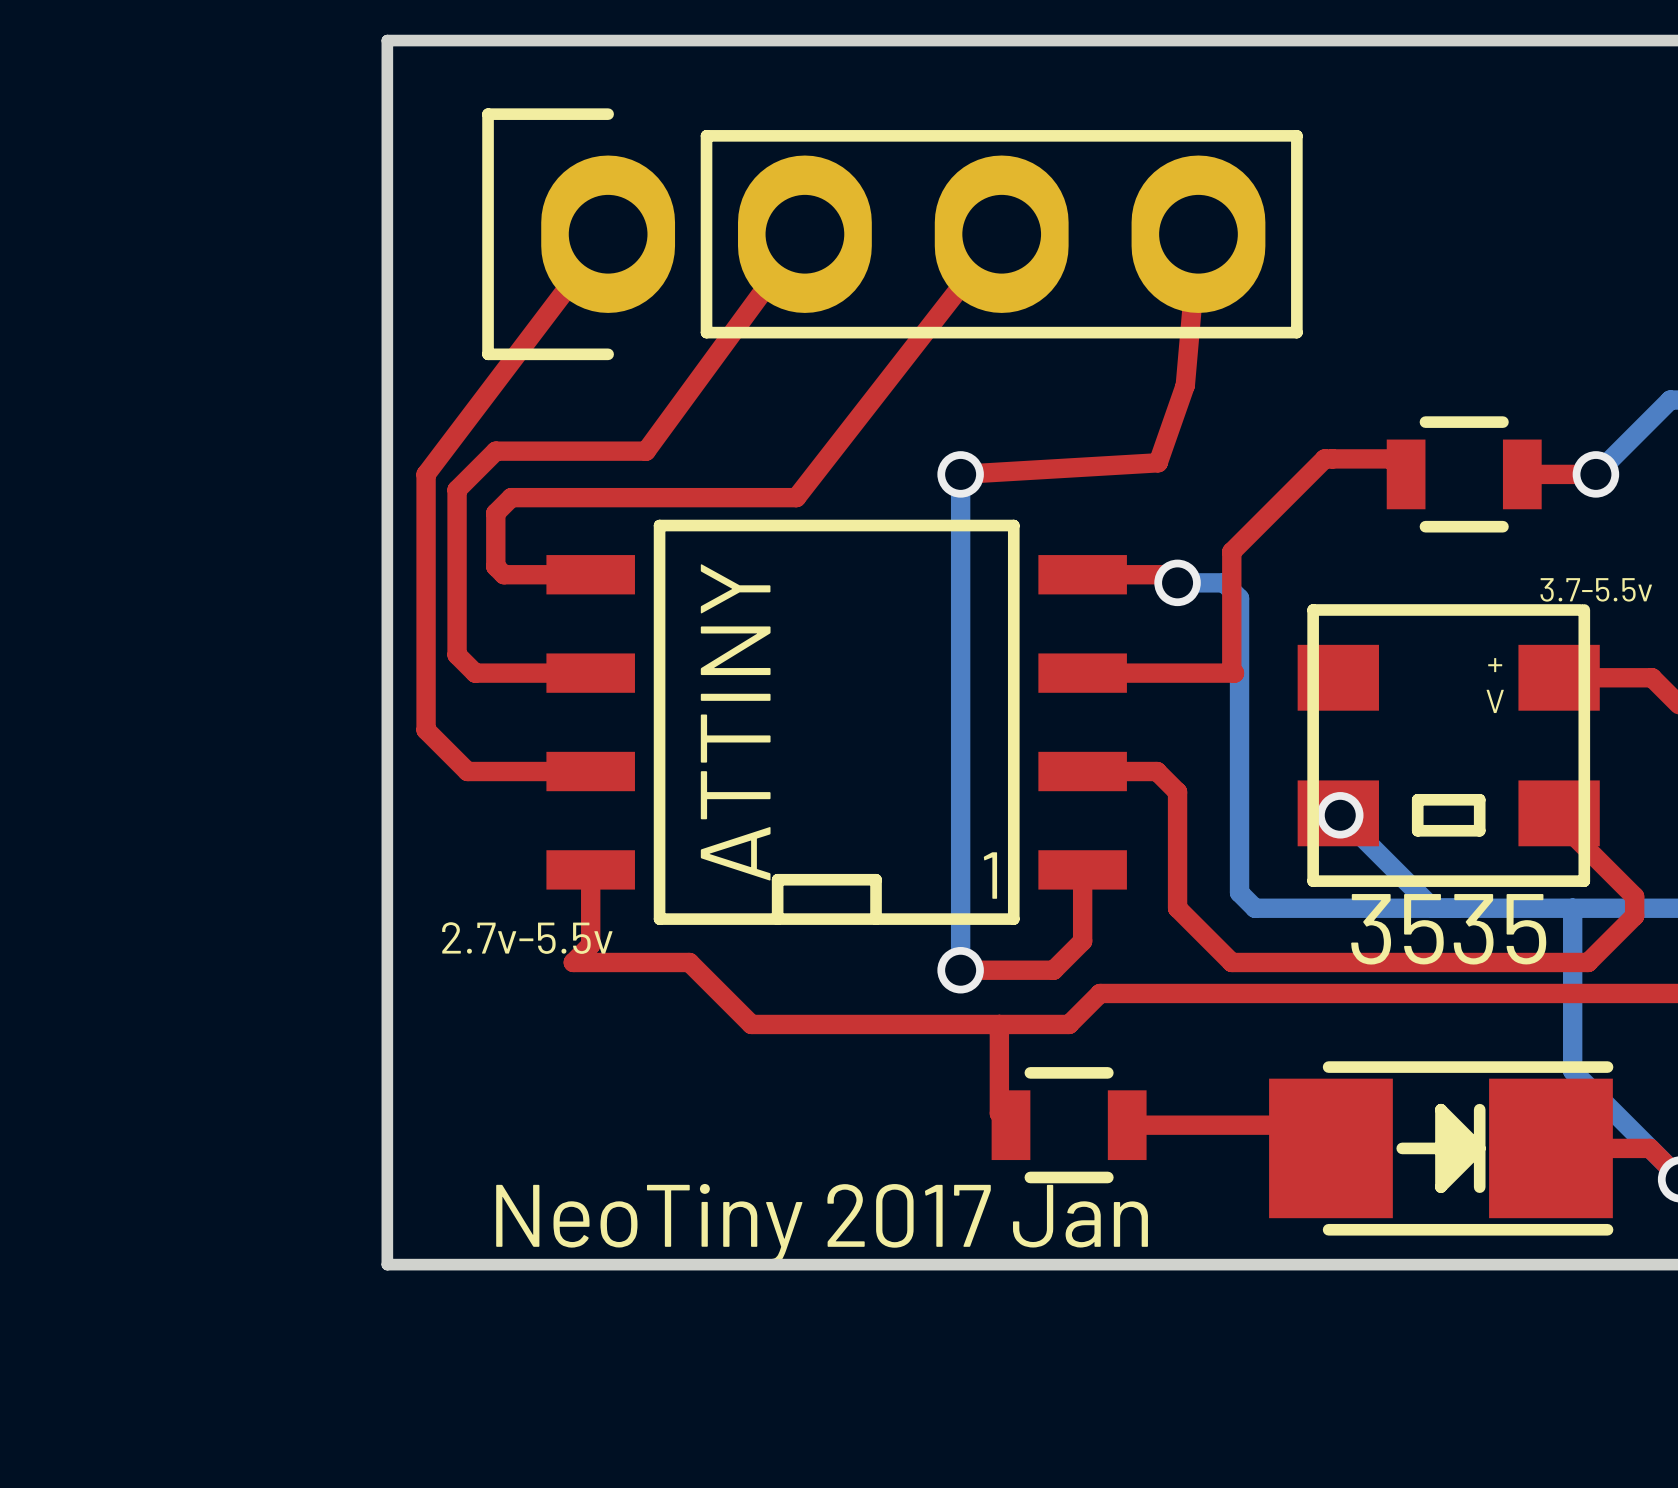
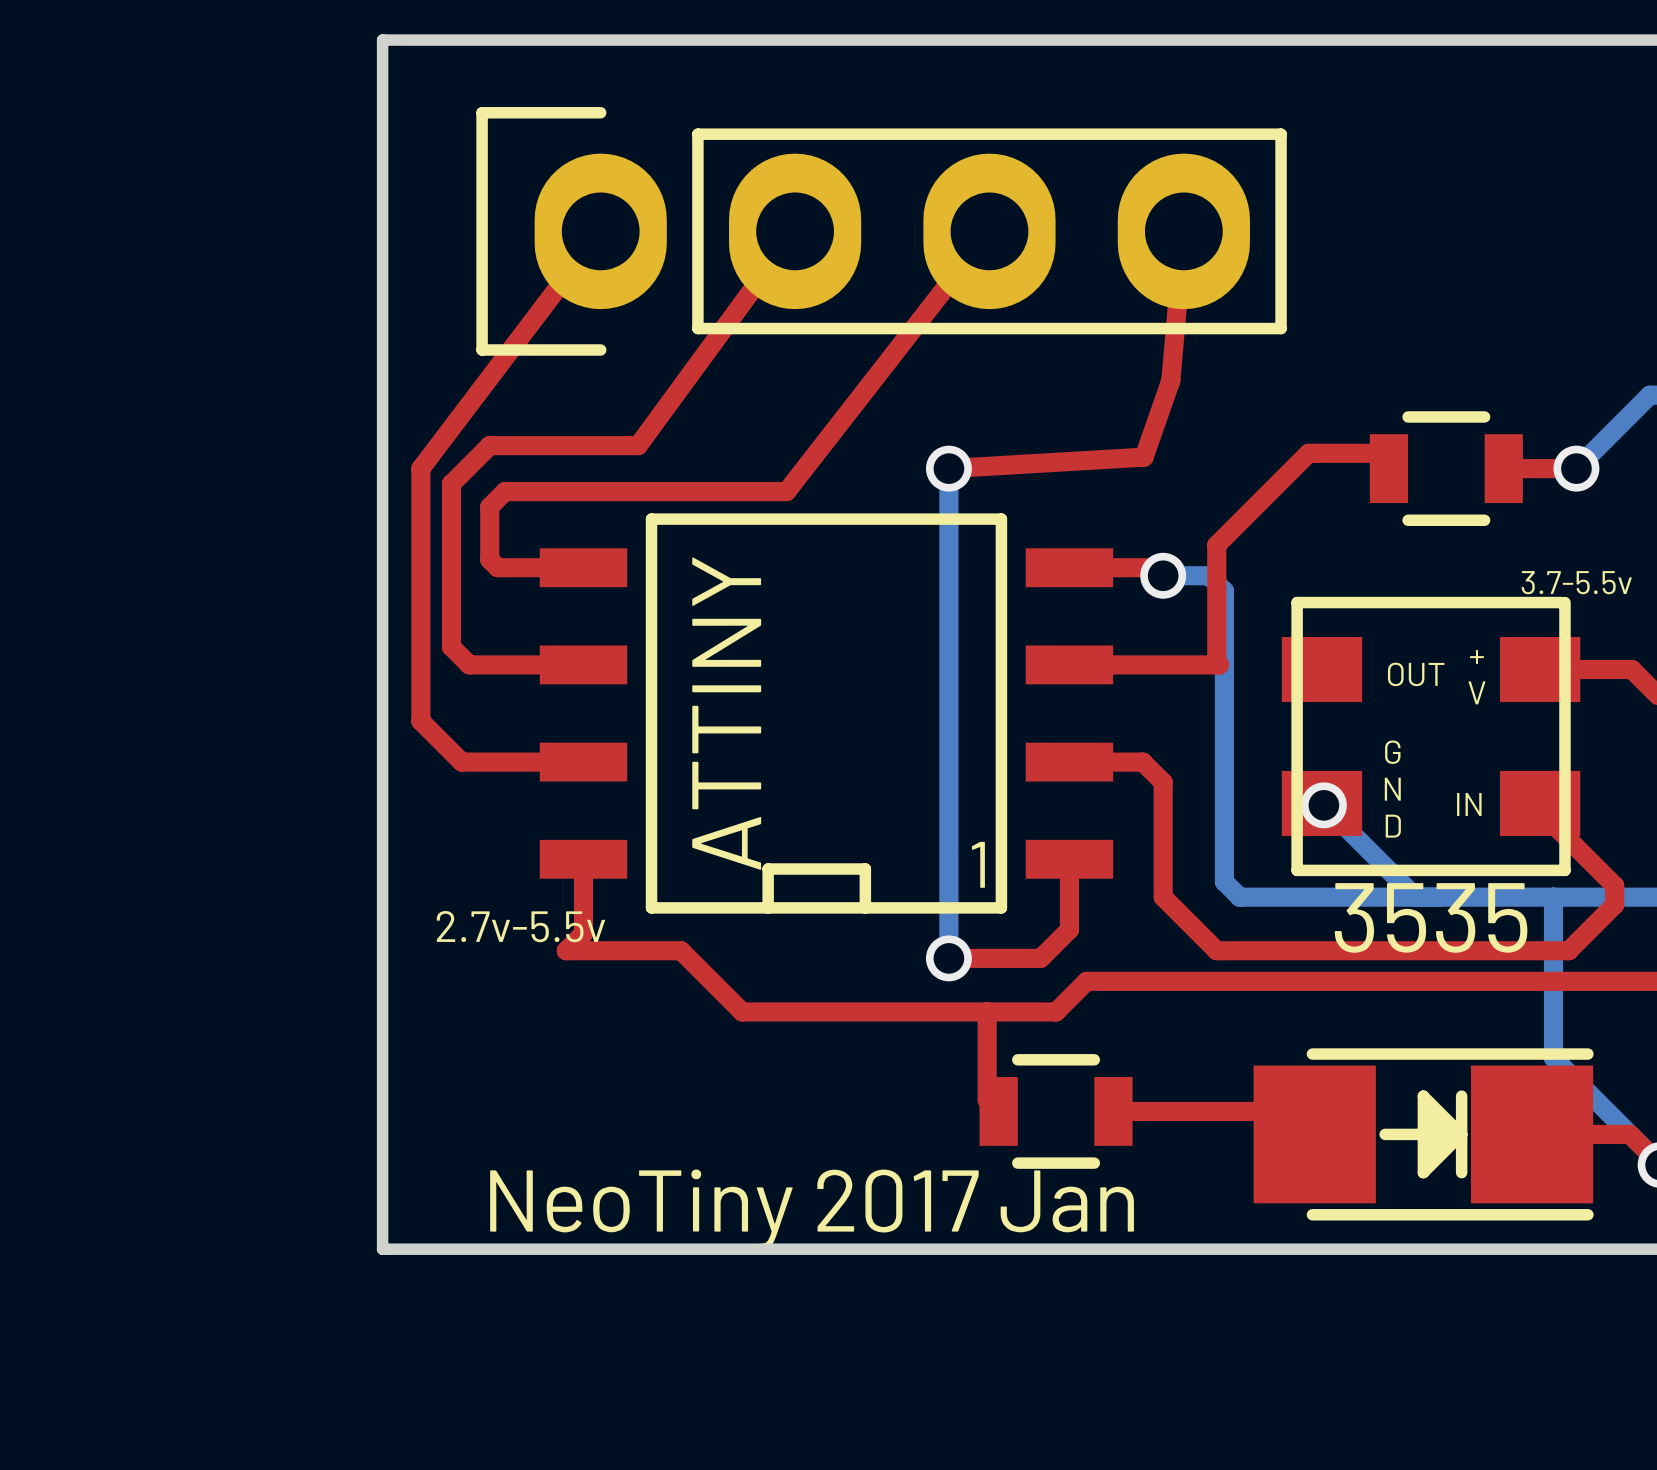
3535 footprint: [1297, 604, 1600, 887] -> [1281, 596, 1581, 877]
text: none -> OUT (1416, 674)
text: none -> G (1392, 752)
text: none -> N (1392, 789)
text: none -> IN (1469, 804)
text: none -> D (1393, 826)

